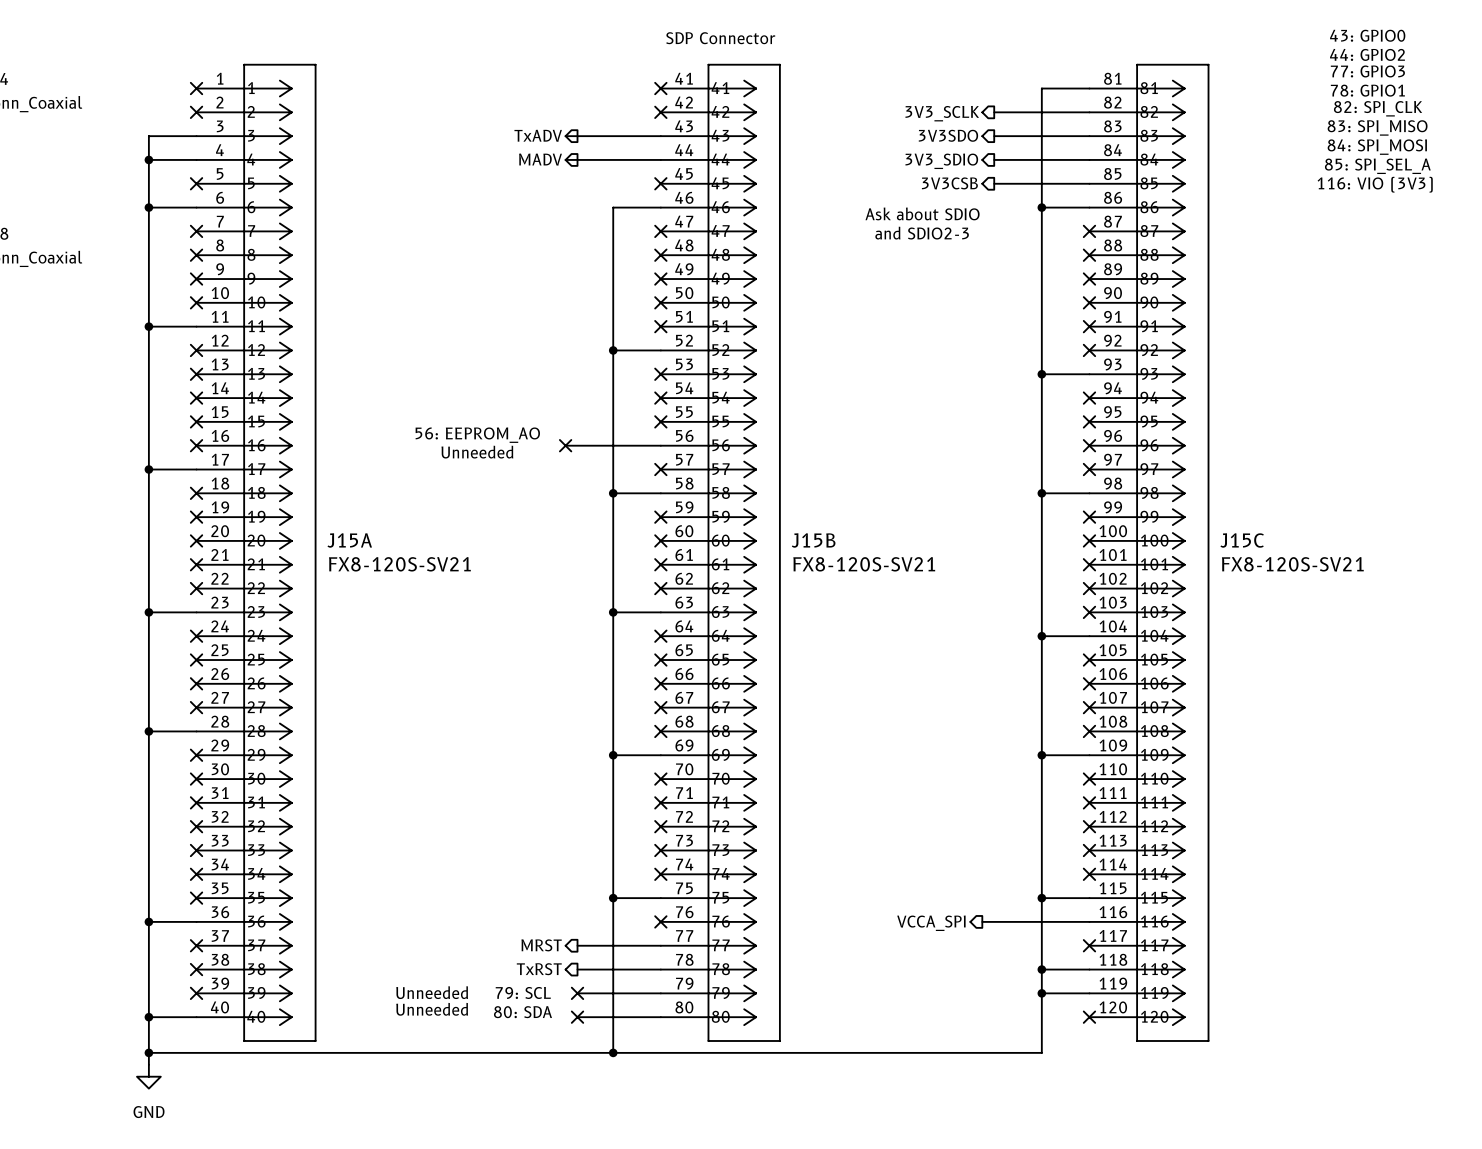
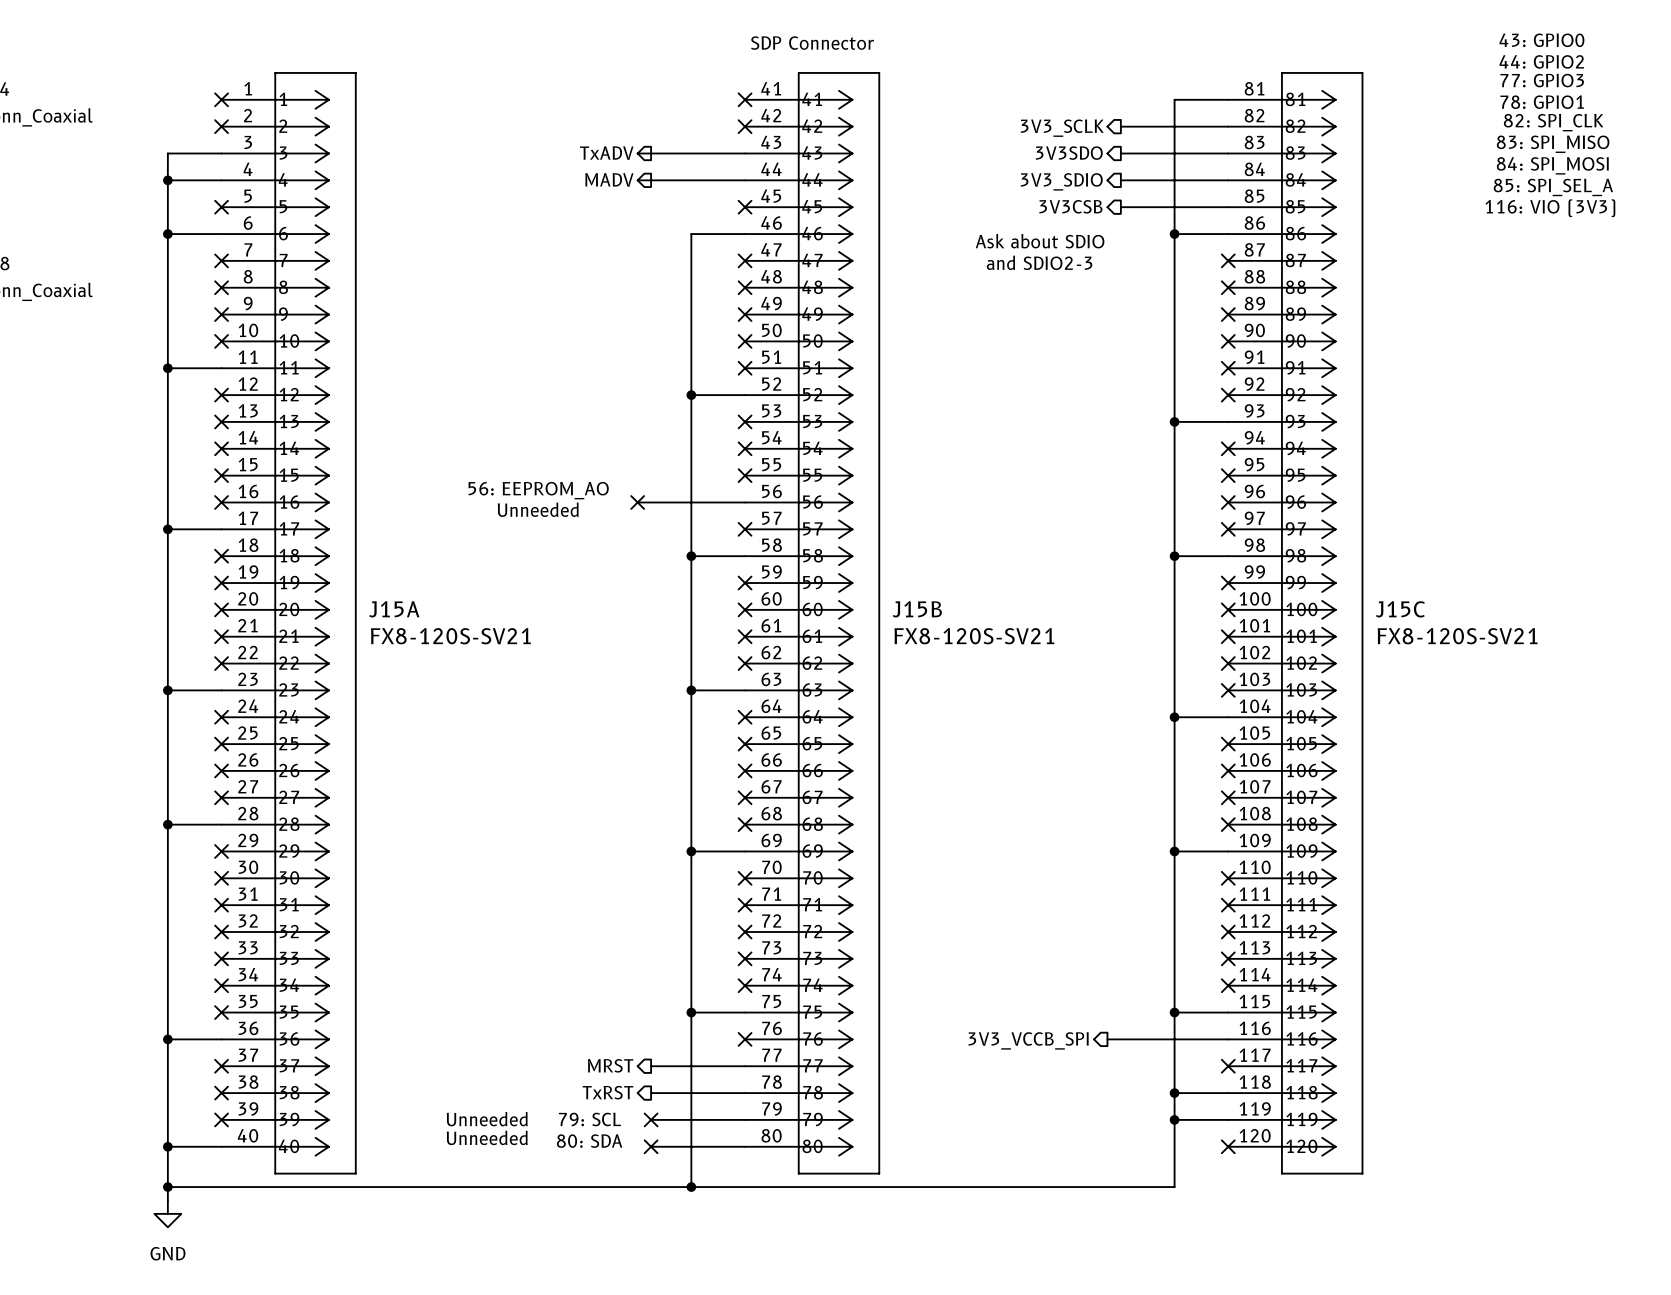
hierarchical label: VCCA_SPI (931, 923) -> 3V3_VCCB_SPI (1028, 1040)

